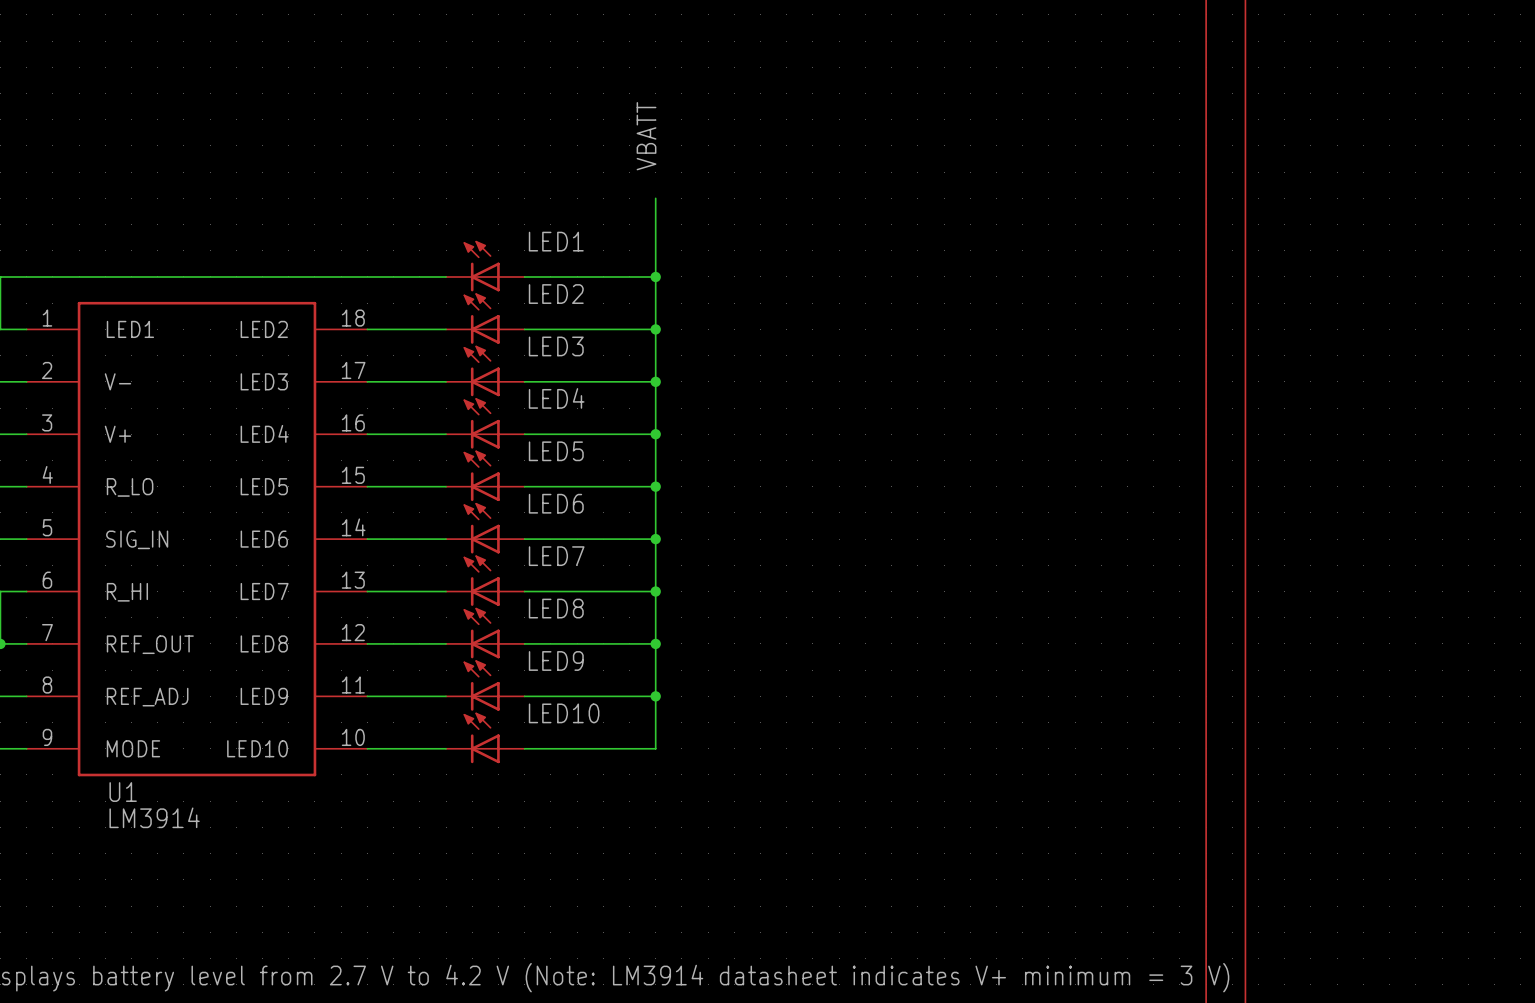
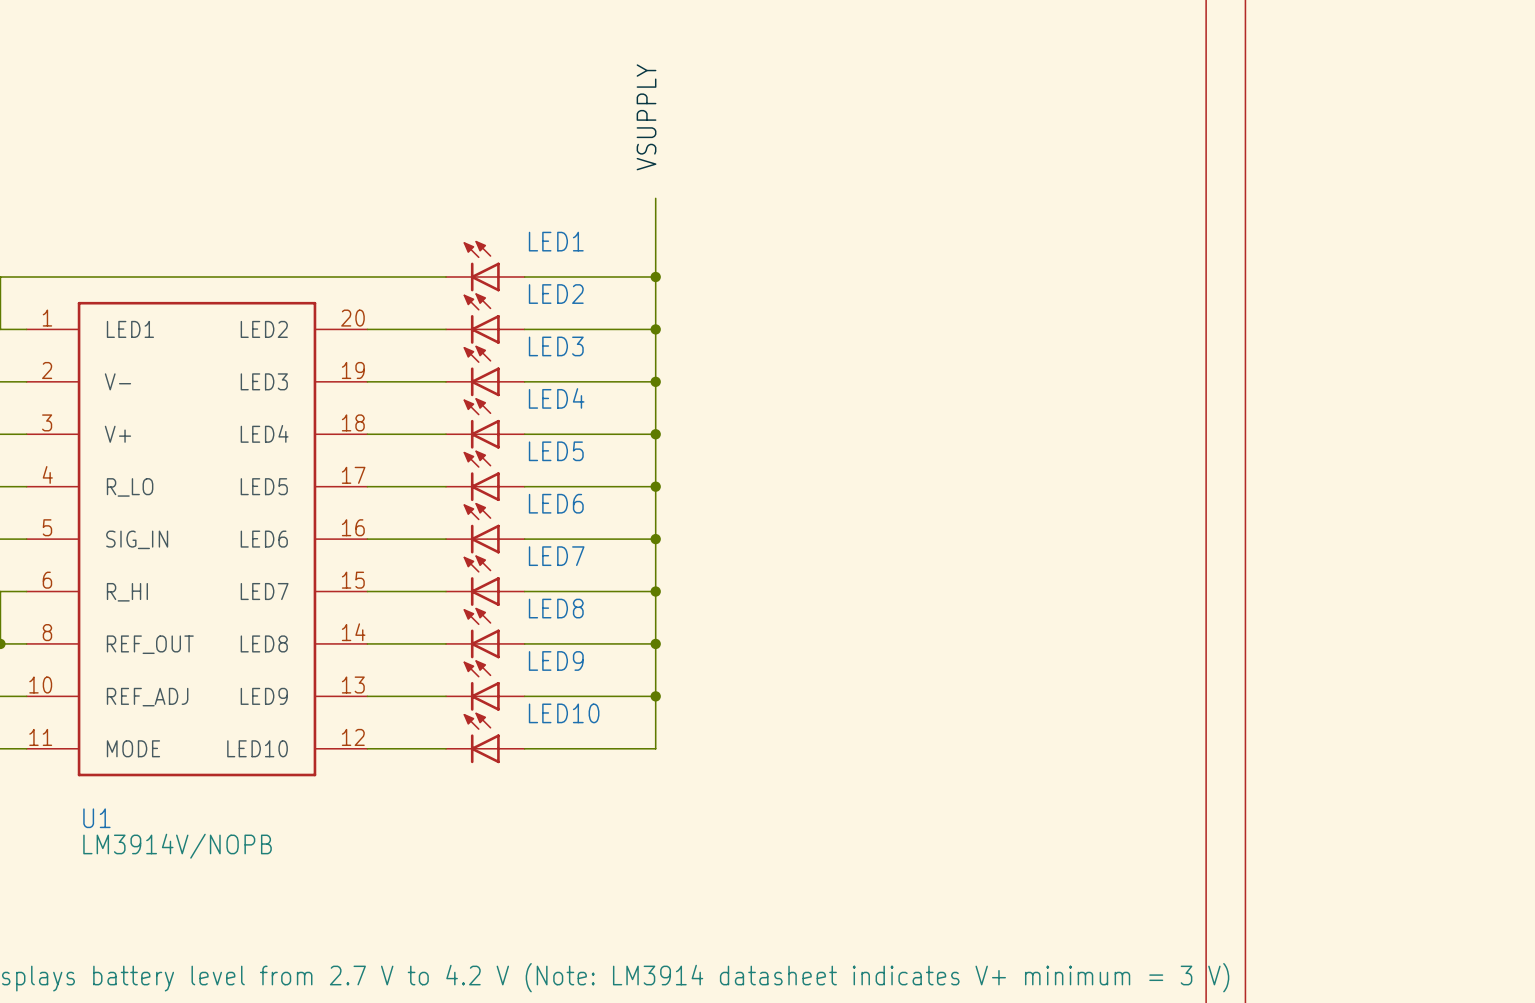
label: VBATT (646, 136) -> VSUPPLY (646, 117)
U1 symbol: [26, 301, 368, 777] -> [26, 301, 368, 777]
U1 name position: U1 (123, 792) -> U1 (96, 818)
U1 value: LM3914 (154, 817) -> LM3914V/NOPB (177, 846)

